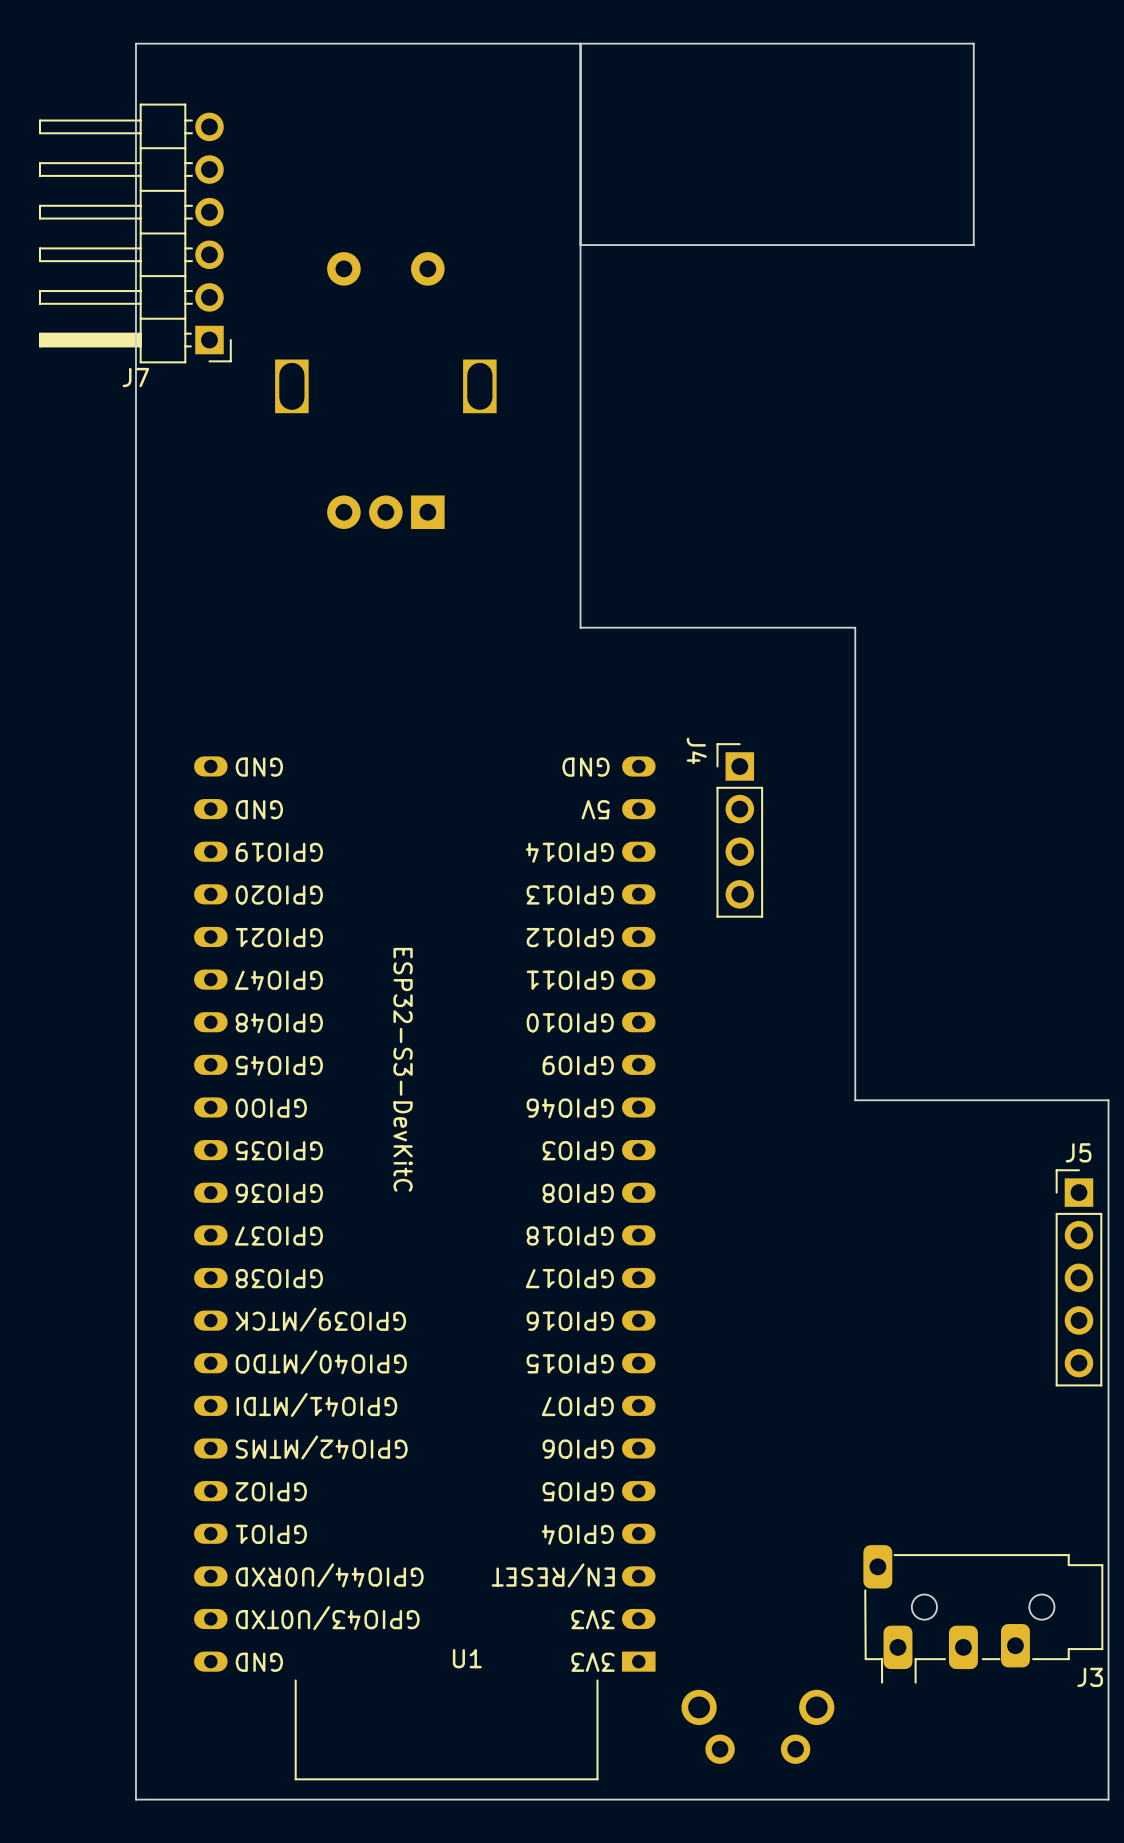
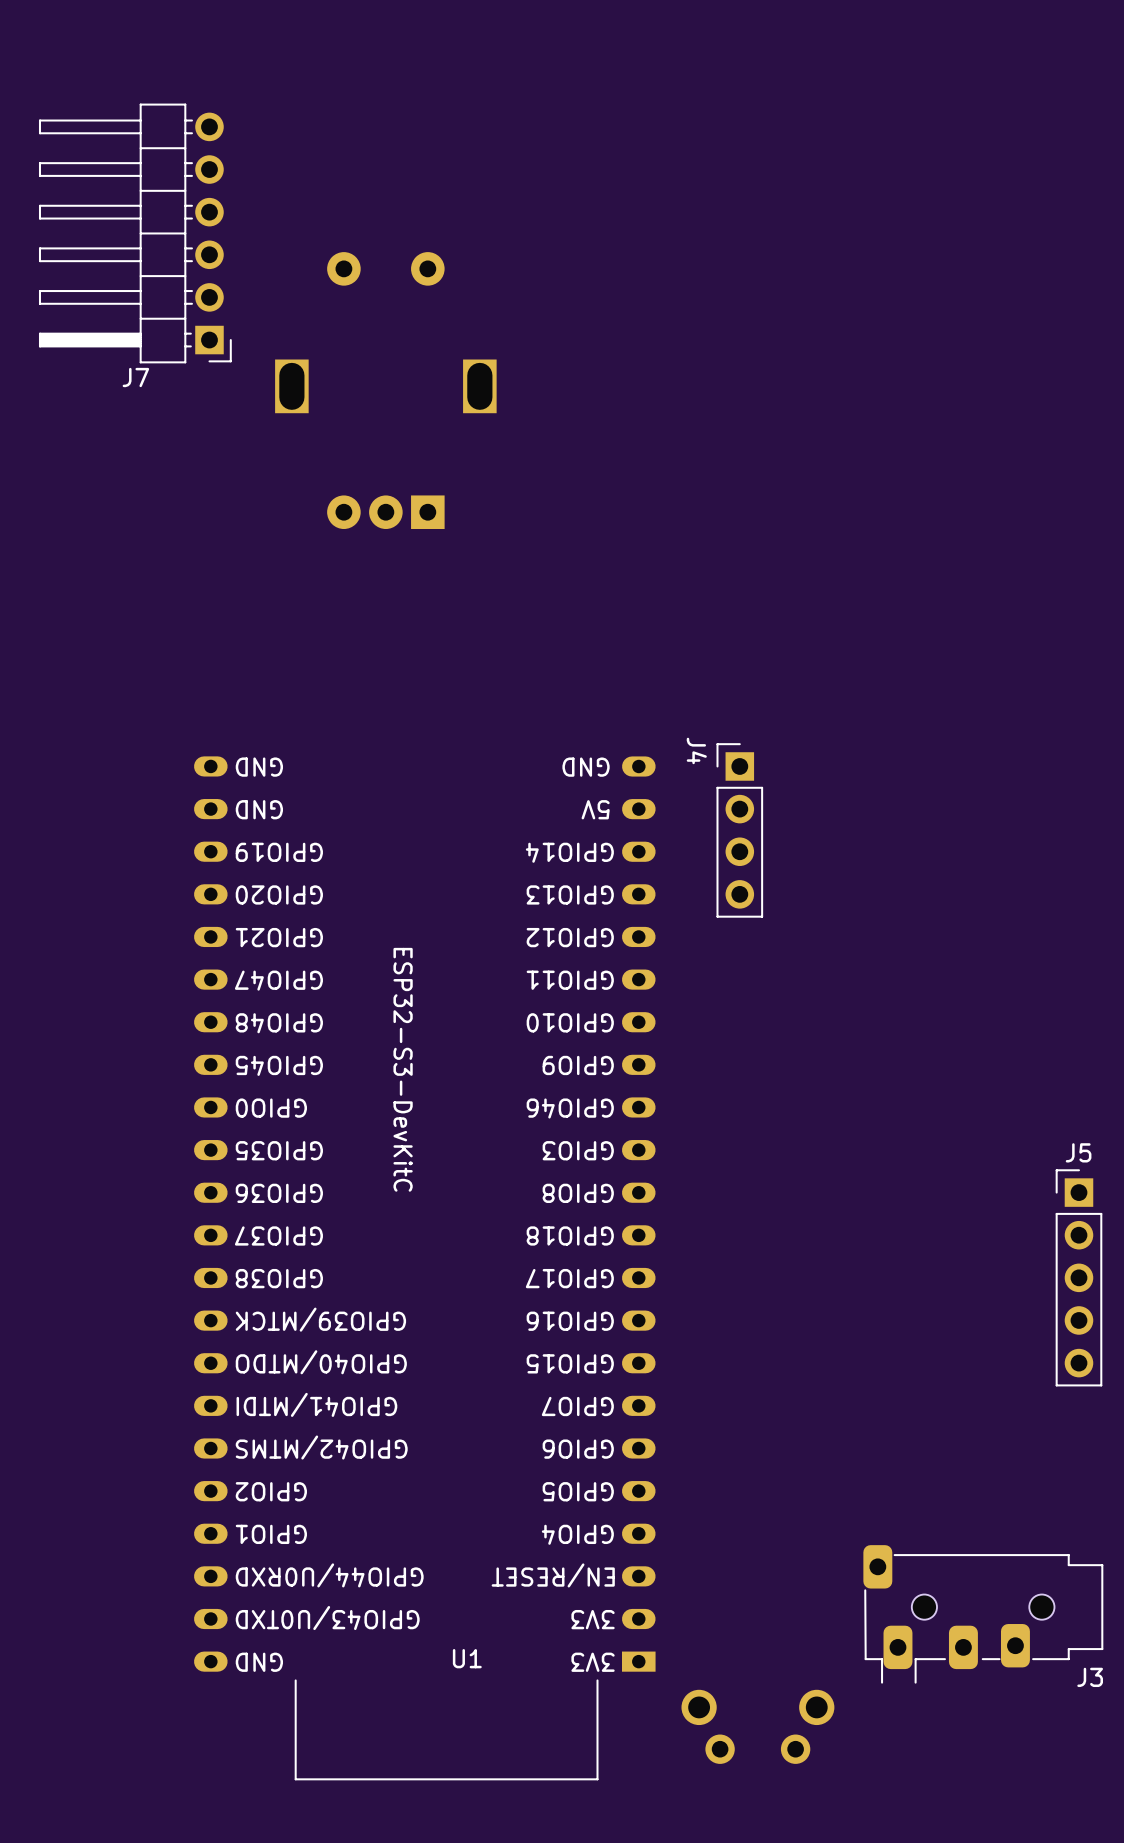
board edge: (580, 43) (580, 627) (855, 627) (855, 1100) (1108, 1100) (1108, 1799) (135, 1799) (135, 43) (973, 43) (973, 245) (580, 245) -> none

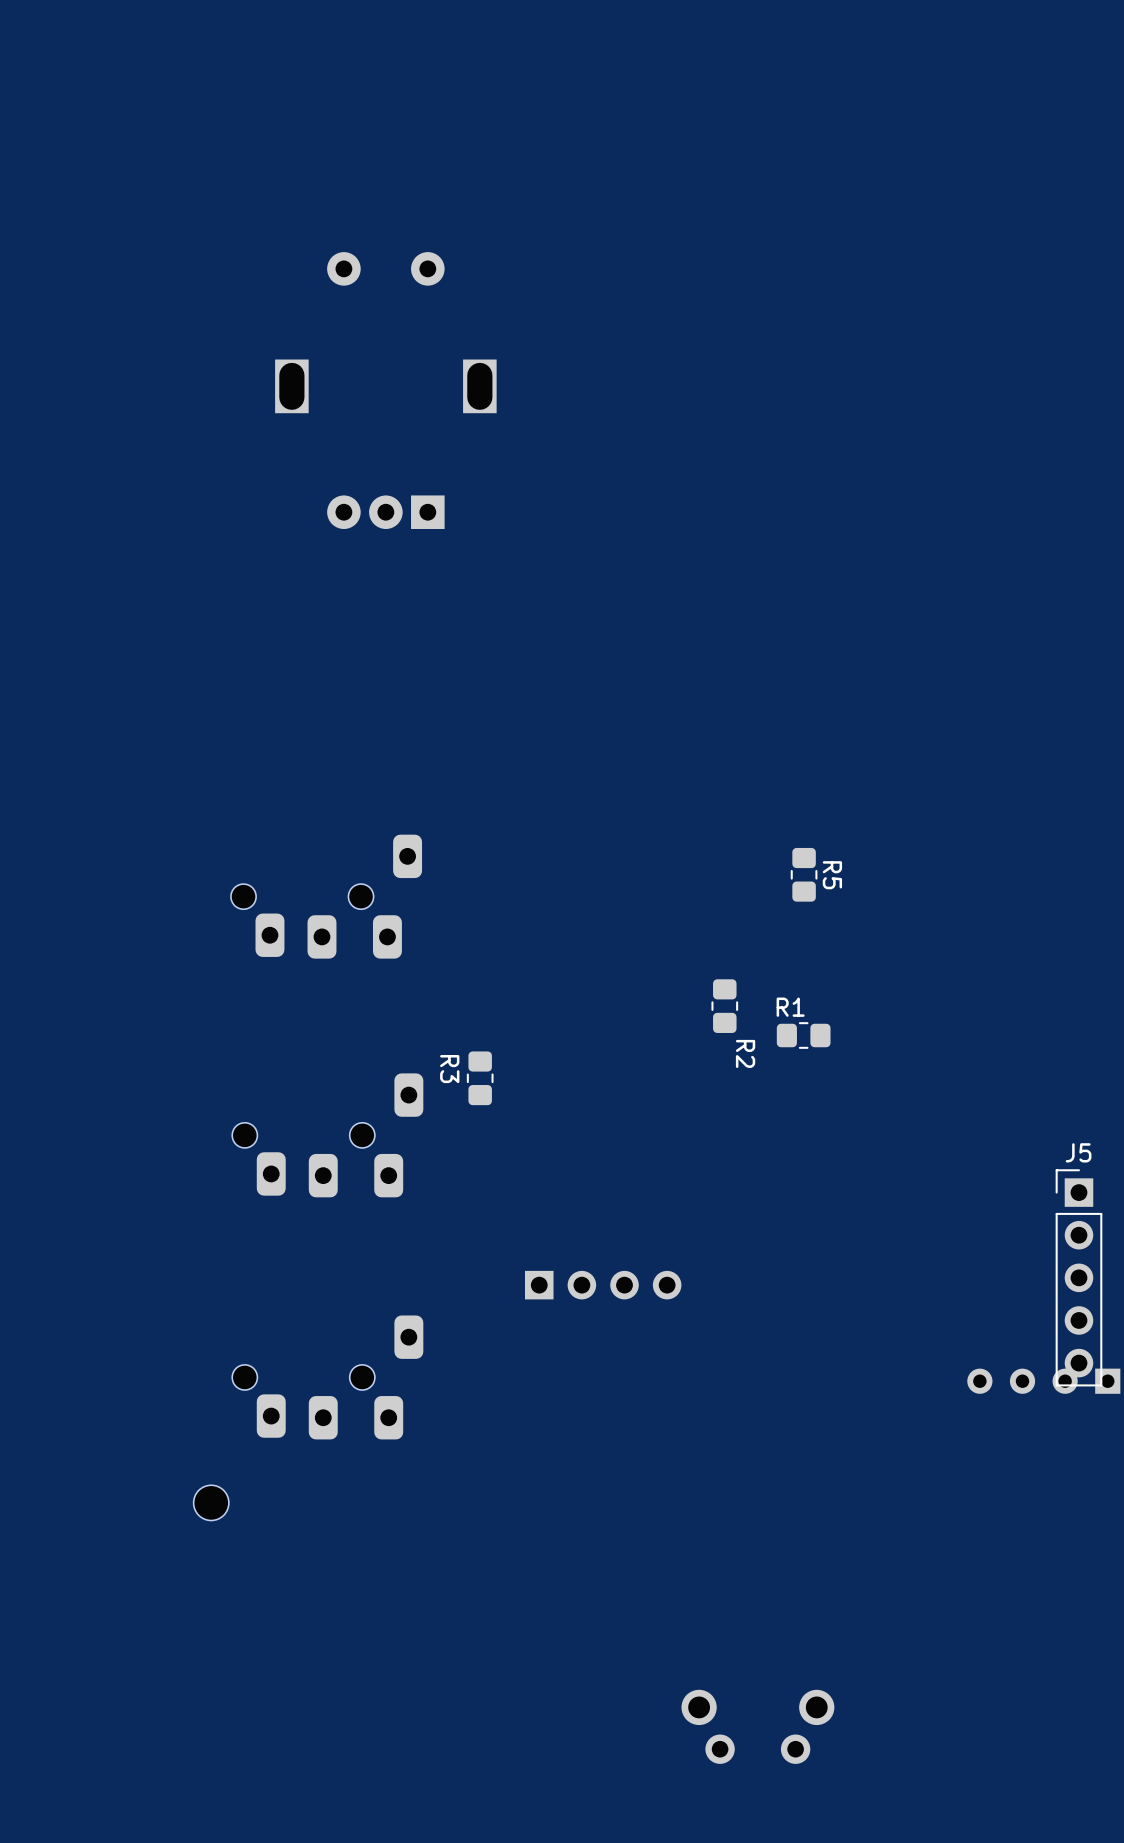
J7: (135, 233) -> none
J4: (739, 830) -> none
R5: none -> (804, 874)
part: none -> (326, 896)
R2: none -> (724, 1006)
R1: none -> (803, 1035)
R3: none -> (480, 1078)
part: none -> (327, 1135)
U1: ESP32-S3-DevKitC (424, 1268) -> none
part: none -> (603, 1285)
part: none -> (327, 1377)
part: none -> (1043, 1381)
part: none -> (211, 1502)
J3: (983, 1614) -> none

